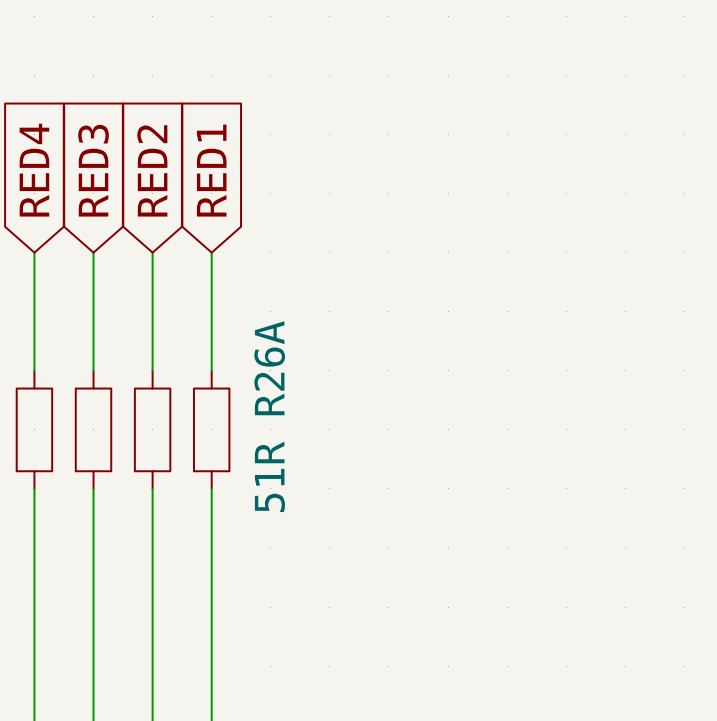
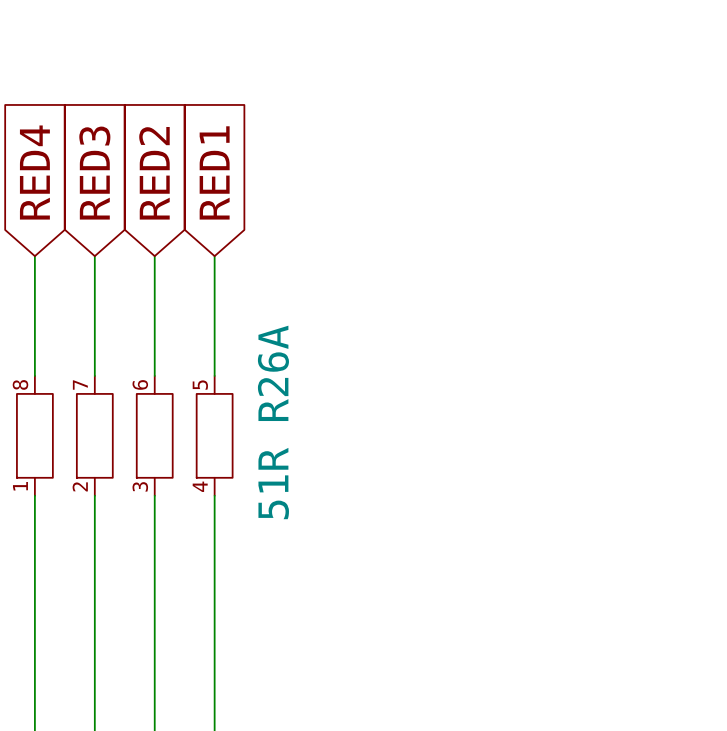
R26A pin number: none -> 8 (20, 384)
part pin number: none -> 7 (80, 385)
part pin number: none -> 6 (140, 384)
part pin number: none -> 5 (200, 385)
R26A pin number: none -> 1 (20, 486)
part pin number: none -> 2 (80, 486)
part pin number: none -> 3 (140, 486)
part pin number: none -> 4 (200, 486)

